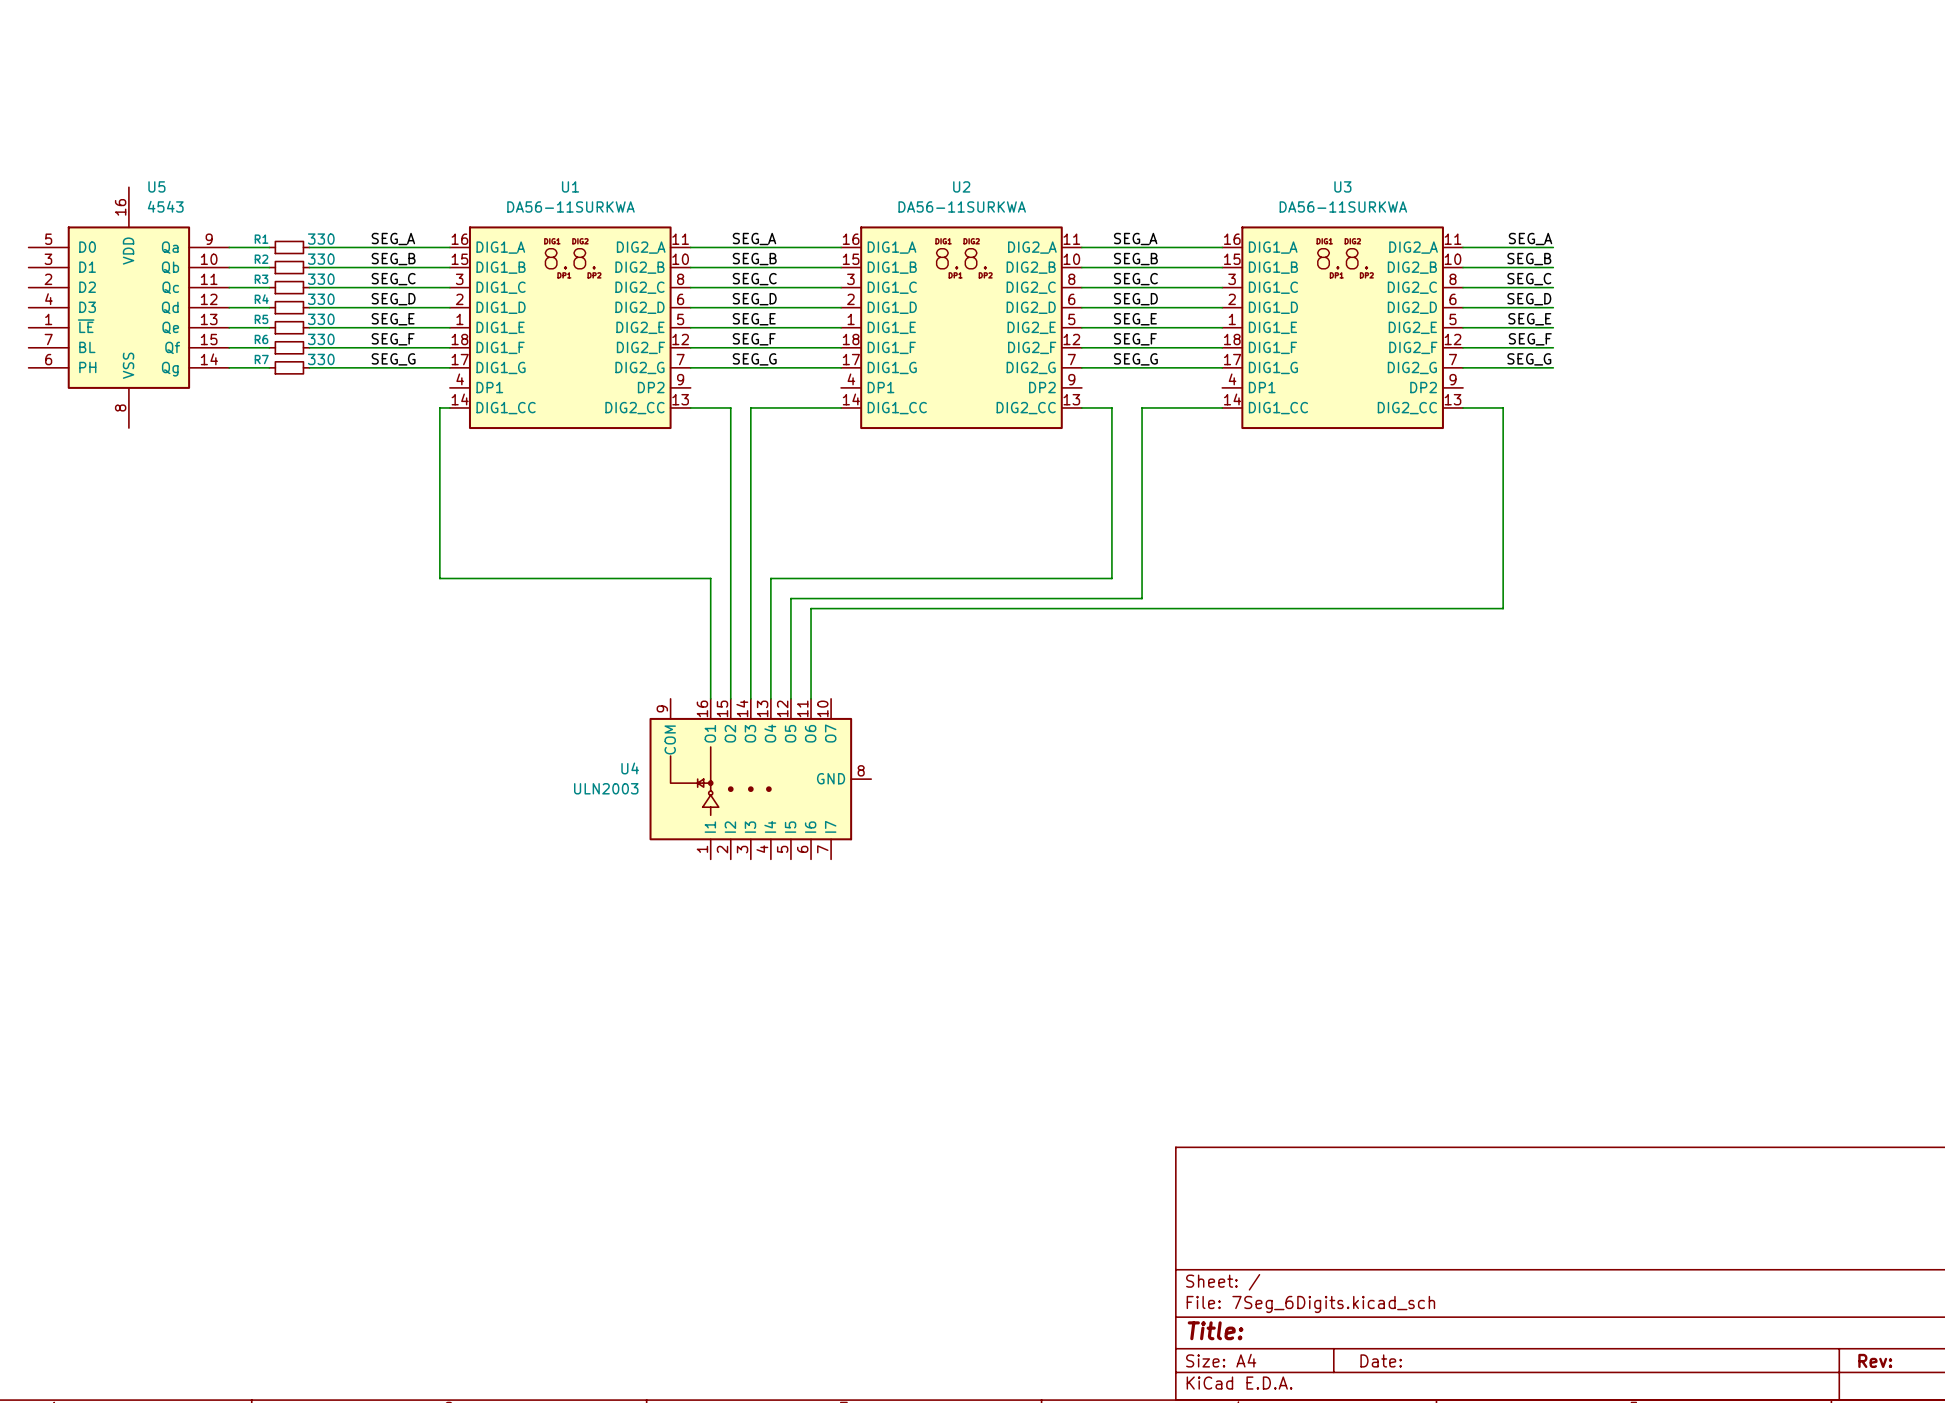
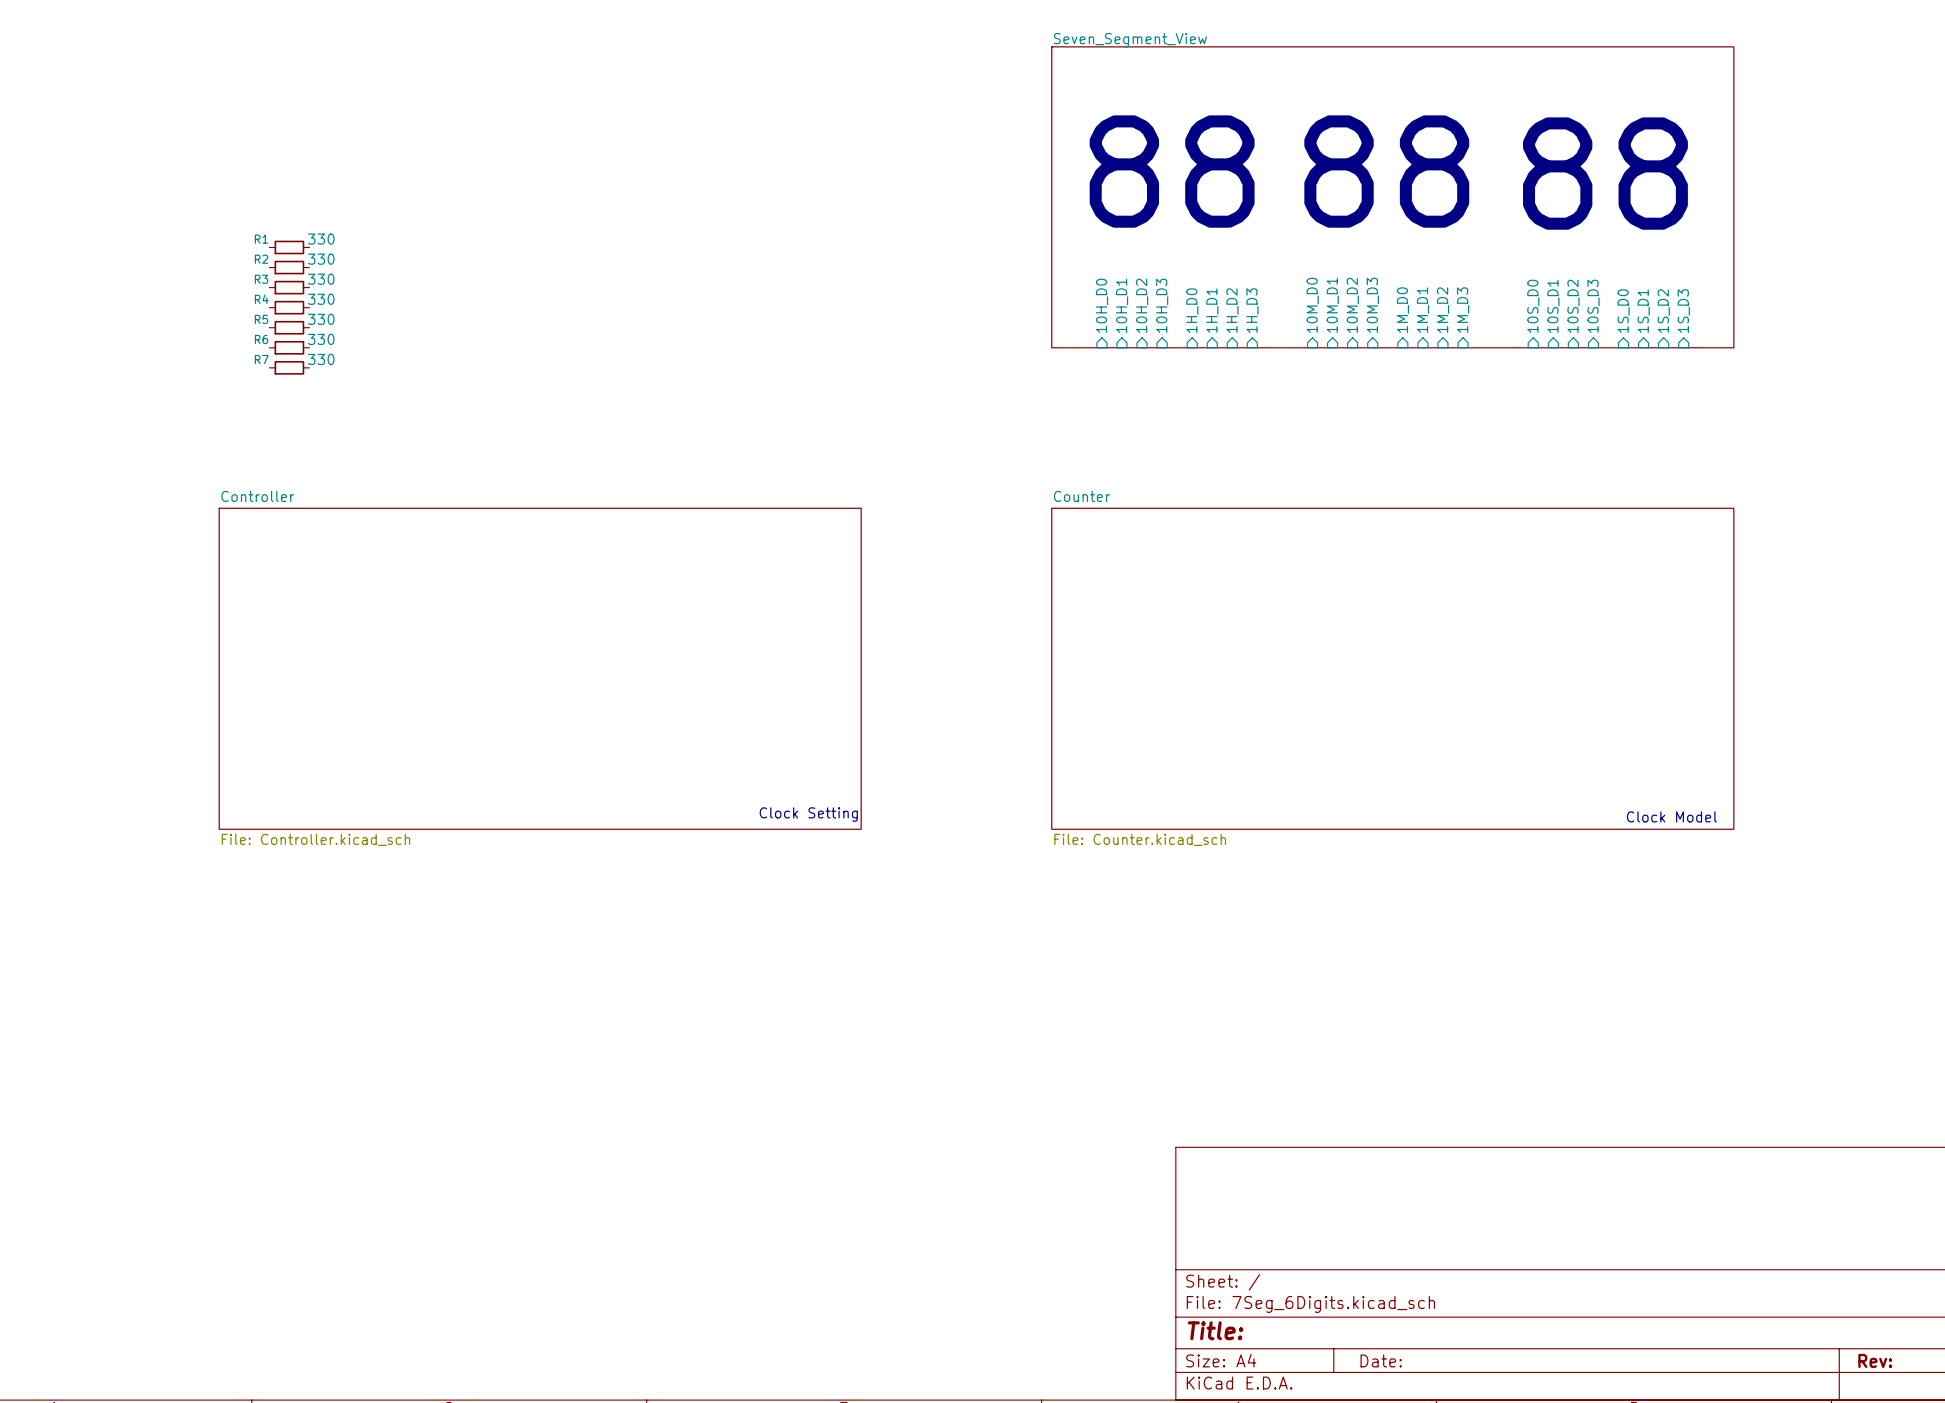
text: none -> 88 (1172, 171)
text: none -> 88 (1386, 171)
text: none -> 88 (1605, 173)
sheet Seven_Segment_View: none -> (1392, 197)
label: SEG_A (393, 239) -> none
label: SEG_A (754, 239) -> none
label: SEG_A (1135, 239) -> none
label: SEG_A (1530, 239) -> none
wire: (229, 247) (269, 247) -> none
wire: (309, 247) (449, 247) -> none
wire: (690, 247) (841, 247) -> none
wire: (1081, 247) (1222, 247) -> none
wire: (1463, 247) (1553, 247) -> none
label: SEG_B (393, 259) -> none
label: SEG_B (754, 259) -> none
label: SEG_B (1135, 259) -> none
label: SEG_B (1529, 259) -> none
wire: (229, 267) (269, 267) -> none
wire: (309, 267) (449, 267) -> none
wire: (690, 267) (841, 267) -> none
wire: (1081, 267) (1222, 267) -> none
wire: (1463, 267) (1553, 267) -> none
label: SEG_C (393, 279) -> none
label: SEG_C (754, 279) -> none
label: SEG_C (1135, 279) -> none
label: SEG_C (1529, 279) -> none
wire: (229, 287) (269, 287) -> none
wire: (309, 287) (449, 287) -> none
wire: (690, 287) (841, 287) -> none
wire: (1081, 287) (1222, 287) -> none
wire: (1463, 287) (1553, 287) -> none
label: SEG_D (393, 299) -> none
label: SEG_D (754, 299) -> none
label: SEG_D (1135, 299) -> none
label: SEG_D (1529, 299) -> none
sheet pin: none -> 10H_D0 (1102, 305)
sheet pin: none -> 10H_D1 (1122, 305)
sheet pin: none -> 10H_D2 (1142, 305)
sheet pin: none -> 10H_D3 (1162, 305)
sheet pin: none -> 10M_D0 (1312, 305)
sheet pin: none -> 10M_D1 (1332, 305)
sheet pin: none -> 10M_D2 (1352, 305)
sheet pin: none -> 10M_D3 (1372, 305)
sheet pin: none -> 10S_D0 (1533, 306)
sheet pin: none -> 10S_D1 (1553, 306)
sheet pin: none -> 10S_D2 (1573, 306)
sheet pin: none -> 10S_D3 (1593, 306)
U5: 4543 (128, 307) -> none
wire: (229, 307) (269, 307) -> none
wire: (309, 307) (449, 307) -> none
wire: (690, 307) (841, 307) -> none
wire: (1081, 307) (1222, 307) -> none
wire: (1463, 307) (1553, 307) -> none
sheet pin: none -> 1H_D0 (1192, 310)
sheet pin: none -> 1H_D1 (1212, 310)
sheet pin: none -> 1H_D2 (1232, 310)
sheet pin: none -> 1H_D3 (1252, 310)
sheet pin: none -> 1M_D0 (1402, 310)
sheet pin: none -> 1M_D1 (1423, 310)
sheet pin: none -> 1M_D2 (1443, 310)
sheet pin: none -> 1M_D3 (1463, 310)
sheet pin: none -> 1S_D0 (1623, 311)
sheet pin: none -> 1S_D1 (1643, 311)
sheet pin: none -> 1S_D2 (1663, 311)
sheet pin: none -> 1S_D3 (1683, 311)
label: SEG_E (393, 319) -> none
label: SEG_E (754, 319) -> none
label: SEG_E (1135, 319) -> none
label: SEG_E (1529, 319) -> none
wire: (229, 327) (269, 327) -> none
wire: (309, 327) (449, 327) -> none
U1: DA56-11SURKWA (570, 327) -> none
wire: (690, 327) (841, 327) -> none
U2: DA56-11SURKWA (961, 327) -> none
wire: (1081, 327) (1222, 327) -> none
U3: DA56-11SURKWA (1342, 327) -> none
wire: (1463, 327) (1553, 327) -> none
label: SEG_F (393, 339) -> none
label: SEG_F (754, 339) -> none
label: SEG_F (1135, 339) -> none
label: SEG_F (1530, 339) -> none
wire: (229, 347) (269, 347) -> none
wire: (309, 347) (449, 347) -> none
wire: (690, 347) (841, 347) -> none
label: SEG_G (393, 359) -> none
label: SEG_G (754, 359) -> none
label: SEG_G (1135, 359) -> none
label: SEG_G (1529, 359) -> none
wire: (229, 367) (269, 367) -> none
wire: (309, 367) (449, 367) -> none
wire: (690, 367) (841, 367) -> none
wire: (1081, 367) (1222, 367) -> none
wire: (1463, 367) (1553, 367) -> none
wire: (449, 407) (439, 407) (439, 578) (710, 578) (710, 698) -> none
wire: (690, 407) (730, 407) (730, 698) -> none
wire: (841, 407) (750, 407) (750, 698) -> none
wire: (1081, 407) (1111, 407) (1111, 578) (770, 578) (770, 698) -> none
wire: (1222, 407) (1142, 407) (1142, 598) (790, 598) (790, 698) -> none
wire: (1463, 407) (1503, 407) (1503, 608) (811, 608) (811, 698) -> none
sheet Controller: none -> File: Controller.kicad_sch (540, 668)
sheet Counter: none -> File: Counter.kicad_sch (1392, 668)
U4: ULN2003 (760, 779) -> none
text: none -> Clock Setting (808, 814)
text: none -> Clock Model (1671, 816)

